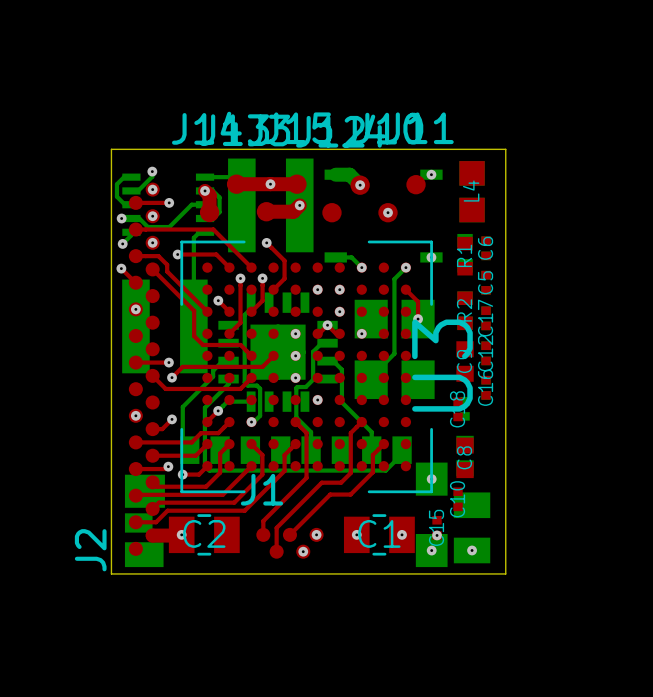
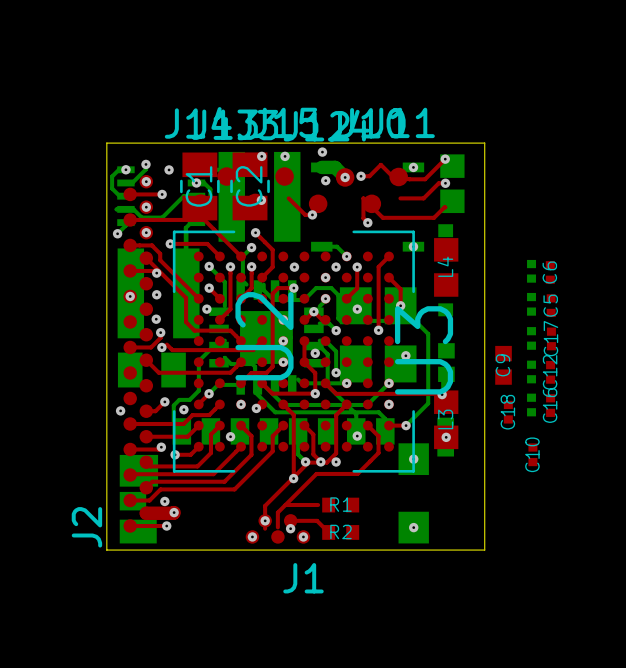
via: none -> (322, 152)
via: none -> (261, 156)
via: none -> (285, 156)
top track: none -> (445, 159) (425, 179) (409, 179)
via: none -> (445, 159)
via: none -> (125, 169)
via: none -> (169, 169)
top track: none -> (361, 176) (369, 176) (380, 164) (395, 179) (409, 179)
via: none -> (361, 176)
top track: (236, 184) (296, 184) -> none
via: (270, 184) -> none
via: none -> (325, 180)
top track: (205, 190) (209, 195) (209, 212) -> none
top track: none -> (445, 183) (438, 183) (423, 198) (400, 198)
via: none -> (445, 183)
L4 position: (472, 191) -> (446, 267)
top track: (299, 205) (293, 211) (266, 211) -> none
via: (299, 205) -> none
top track: none -> (288, 198) (305, 214) (312, 214)
via: none -> (261, 200)
via: (388, 212) -> none
top track: none -> (445, 207) (434, 217) (382, 217) (363, 198) (363, 218) (367, 222)
via: (121, 218) -> none
via: none -> (312, 214)
via: none -> (367, 222)
C6 position: (486, 248) -> (550, 272)
R1 rotation: 0° (465, 256) -> 90° clockwise (340, 505)
R1 position: (465, 256) -> (340, 505)
bottom track: none -> (251, 247) (242, 256) (242, 280) (246, 284)
via: none -> (251, 247)
bottom track: (405, 267) (394, 279) (394, 353) (371, 376) (371, 379) -> none
top track: none -> (389, 256) (378, 266) (378, 330)
via: (405, 267) -> none
top track: (121, 268) (135, 282) -> (156, 273) (154, 270) (130, 270)
via: (121, 268) -> none
bottom track: none -> (209, 266) (224, 282) (224, 306)
via: none -> (209, 266)
via: none -> (294, 267)
via: none -> (336, 267)
top track: none -> (357, 267) (357, 288) (346, 298)
via: none -> (357, 267)
C5 position: (486, 282) -> (551, 305)
part: none -> (531, 271)
via: none -> (156, 273)
via: (317, 289) -> none
bottom track: none -> (263, 284) (263, 290) (273, 300) (304, 300) (316, 288) (331, 288) (338, 295) (338, 318) (340, 320) (415, 320) (428, 333) (428, 403) (406, 425)
top track: none -> (293, 288) (278, 288) (272, 293) (272, 366) (266, 372) (251, 372) (241, 383)
via: none -> (293, 288)
bottom track: (251, 302) (251, 308) (244, 314) (244, 382) (247, 385) (256, 385) (260, 388) (260, 415) (251, 422) -> none
via: none -> (156, 294)
R2 rotation: 0° (465, 310) -> 90° clockwise (340, 532)
R2 position: (465, 310) -> (340, 532)
bottom track: none -> (325, 298) (319, 306)
part: none -> (531, 304)
C17 position: (486, 318) -> (551, 338)
via: none -> (206, 309)
via: none -> (357, 309)
part position: (164, 326) -> (158, 293)
via: none -> (156, 319)
via: (361, 333) -> none
bottom track: none -> (319, 323) (329, 323) (336, 330)
bottom track: (327, 343) (321, 343) (313, 351) (313, 379) (305, 387) (296, 388) (296, 417) (311, 432) (311, 450) -> (305, 461) (298, 454) (298, 431)
via: none -> (378, 330)
via: none -> (336, 330)
via: none -> (160, 332)
U2 name: none -> U2 (264, 336)
C12 position: (486, 353) -> (550, 372)
part: none -> (531, 338)
top track: none -> (304, 341) (304, 362) (315, 373) (315, 393) (272, 393) (262, 383)
bottom track: none -> (319, 340) (325, 340) (336, 351) (336, 372)
bottom track: (228, 361) (222, 361) (213, 370) (213, 376) (182, 406) (182, 443) -> (224, 340) (219, 340) (198, 361) (198, 390) (189, 399) (179, 399) (173, 405) (175, 424)
C9 position: (465, 361) -> (503, 365)
top track: (157, 362) (168, 362) -> (151, 347) (160, 337) (160, 332)
top track: (264, 365) (262, 366) (182, 366) (172, 377) -> (253, 350) (172, 350) (166, 344)
via: none -> (315, 353)
via: none -> (405, 355)
via: (172, 377) -> none
bottom track: (228, 379) (228, 384) (204, 407) (204, 466) (209, 470) (385, 470) (402, 454) (402, 450) -> (224, 357) (231, 364) (252, 364) (255, 366) (255, 392) (275, 412) (378, 412) (385, 418) (385, 431)
C16 position: (486, 387) -> (550, 405)
via: none -> (336, 372)
part: none -> (531, 371)
bottom track: none -> (263, 379) (263, 385) (283, 404) (367, 404) (389, 383)
bottom track: none -> (298, 379) (301, 383) (346, 383)
via position: (317, 399) -> (315, 393)
top track: none -> (325, 383) (336, 393) (437, 393) (446, 402)
via: none -> (346, 383)
via: none -> (389, 383)
C18 position: (458, 409) -> (508, 412)
via: none -> (442, 394)
via position: (135, 415) -> (120, 410)
via: none -> (389, 404)
part: none -> (531, 404)
via: none -> (256, 408)
via: none -> (183, 409)
L3: none -> (446, 419)
top track: none -> (304, 425) (313, 434) (313, 454) (320, 461)
top track: (383, 444) (372, 455) (372, 472) (350, 494) -> (367, 425) (378, 436) (378, 452) (357, 473) (336, 473)
top track: none -> (389, 425) (406, 425)
via: none -> (406, 425)
via: none -> (230, 436)
via: none -> (357, 436)
via: none -> (446, 437)
C8 side: top (465, 457) -> bottom (446, 362)
top track: (306, 477) (263, 521) (263, 534) -> (293, 457) (293, 478)
via: none -> (305, 461)
via: none -> (320, 461)
via: none -> (336, 461)
via: none -> (293, 478)
C10 position: (458, 499) -> (532, 454)
via: none -> (164, 501)
top track: none -> (285, 505) (318, 505)
C15: (437, 527) -> none
part rotation: 0° (472, 527) -> 90° clockwise (151, 370)
part position: (472, 527) -> (151, 370)
C2 rotation: 0° (204, 534) -> 90° clockwise (250, 186)
C2 position: (204, 534) -> (250, 186)
top track: none -> (277, 512) (277, 527)
via: (316, 534) -> none
via: (356, 534) -> none
C1 rotation: 0° (379, 534) -> 90° clockwise (199, 186)
C1 position: (379, 534) -> (199, 186)
via: (402, 534) -> none
via: (437, 535) -> none
via: none -> (265, 520)
J1 rotation: 0° (289, 543) -> 180° (277, 528)
top track: none -> (290, 520) (317, 520) (328, 532)
top track: none -> (130, 526) (166, 526)
via: none -> (166, 526)
via: (472, 550) -> none
via: none -> (252, 536)
via: none -> (303, 536)

